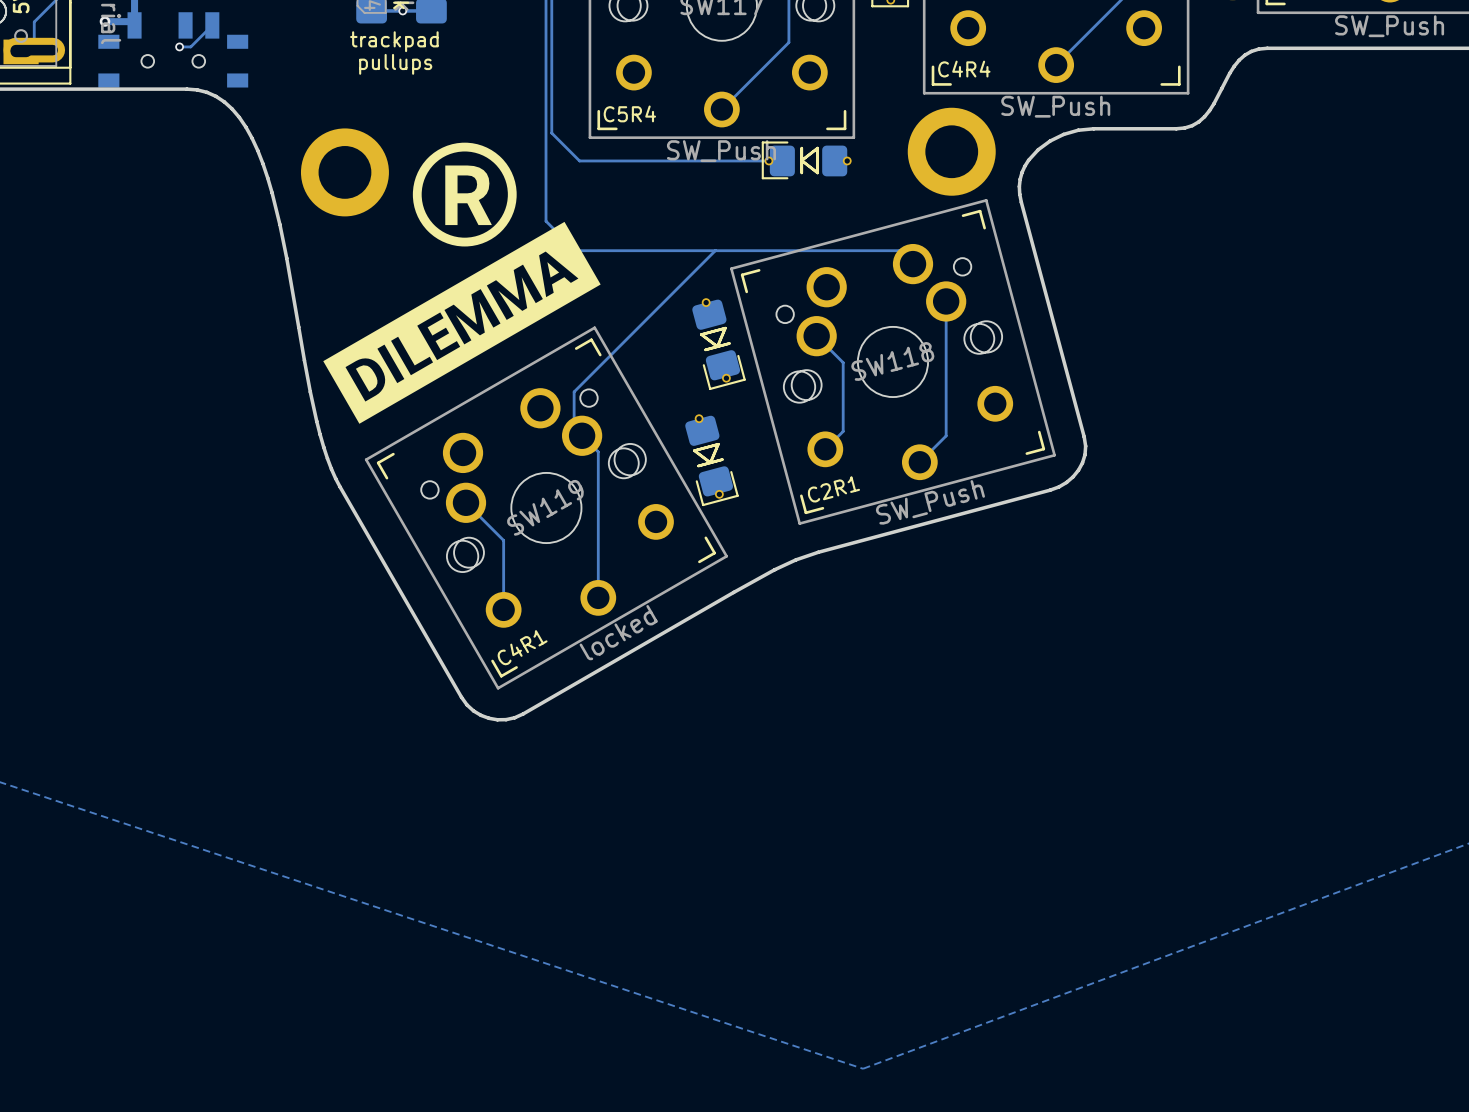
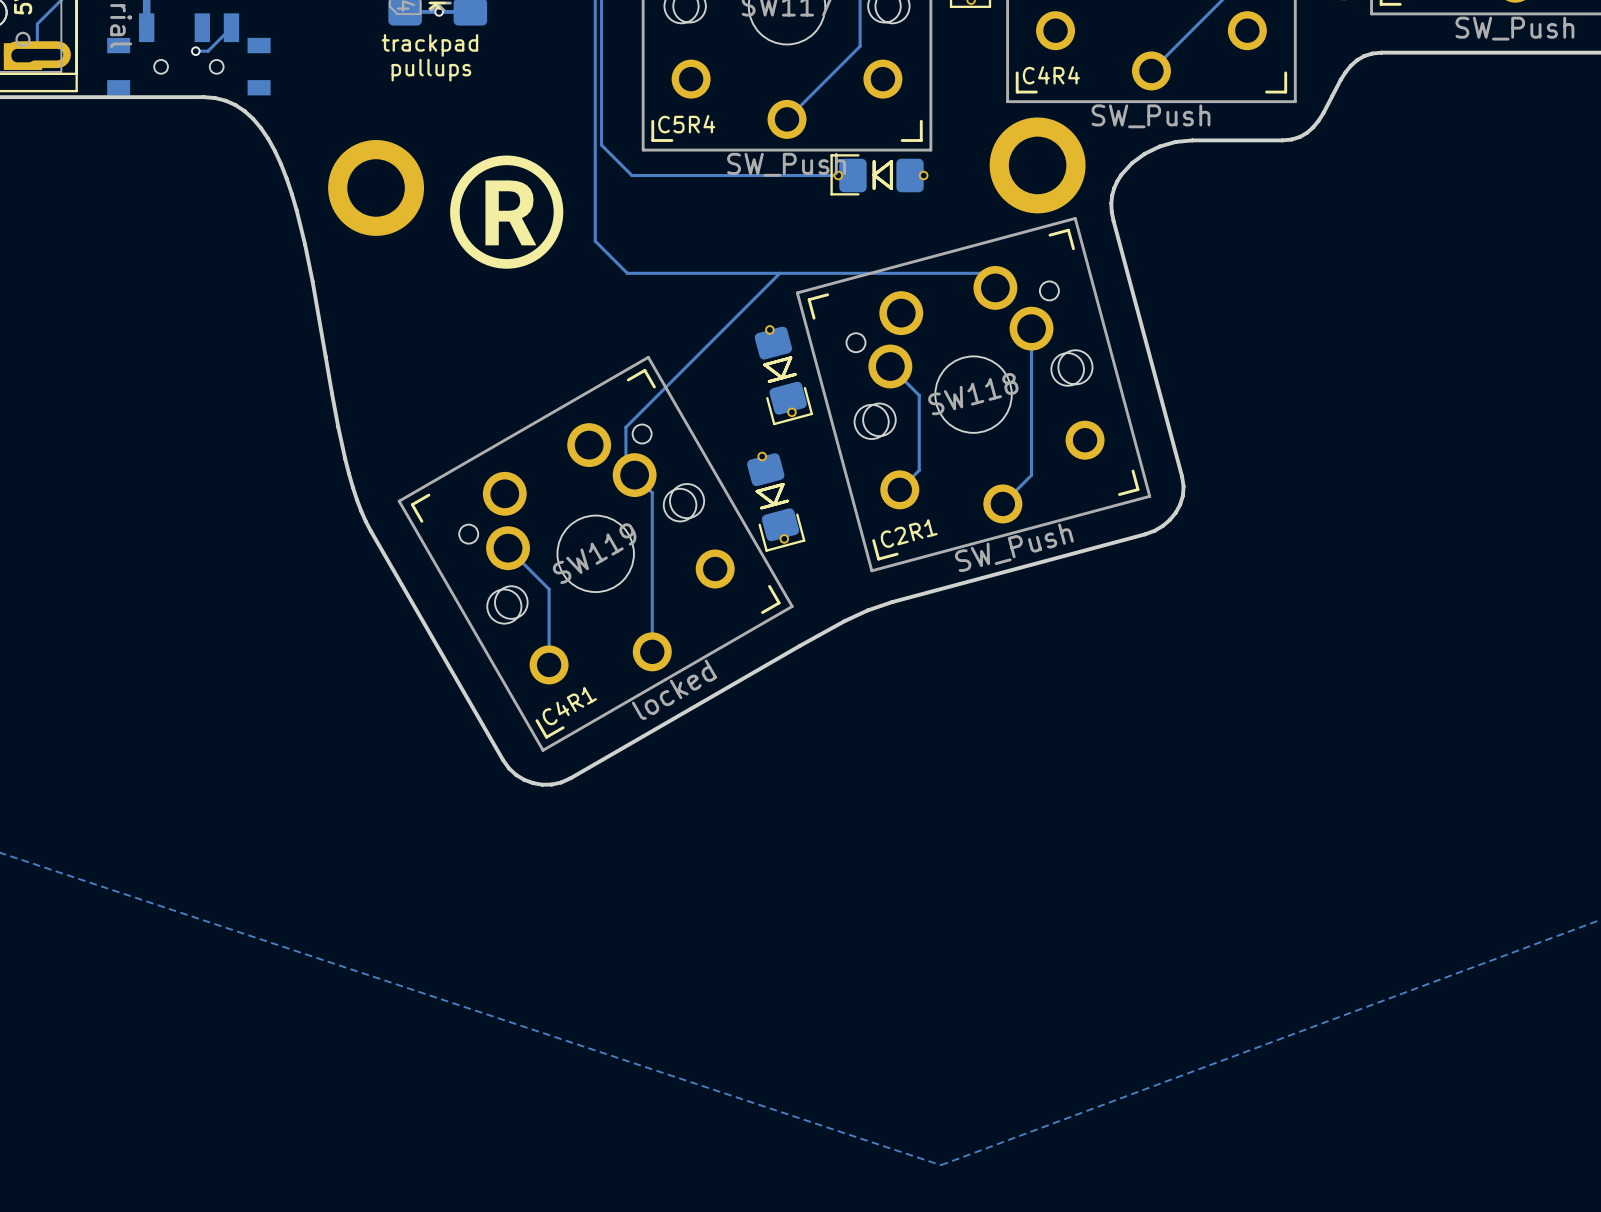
via: (104, 21) -> none
track: (130, 21) (105, 21) -> none
drawing: [323, 221, 601, 424] -> none

